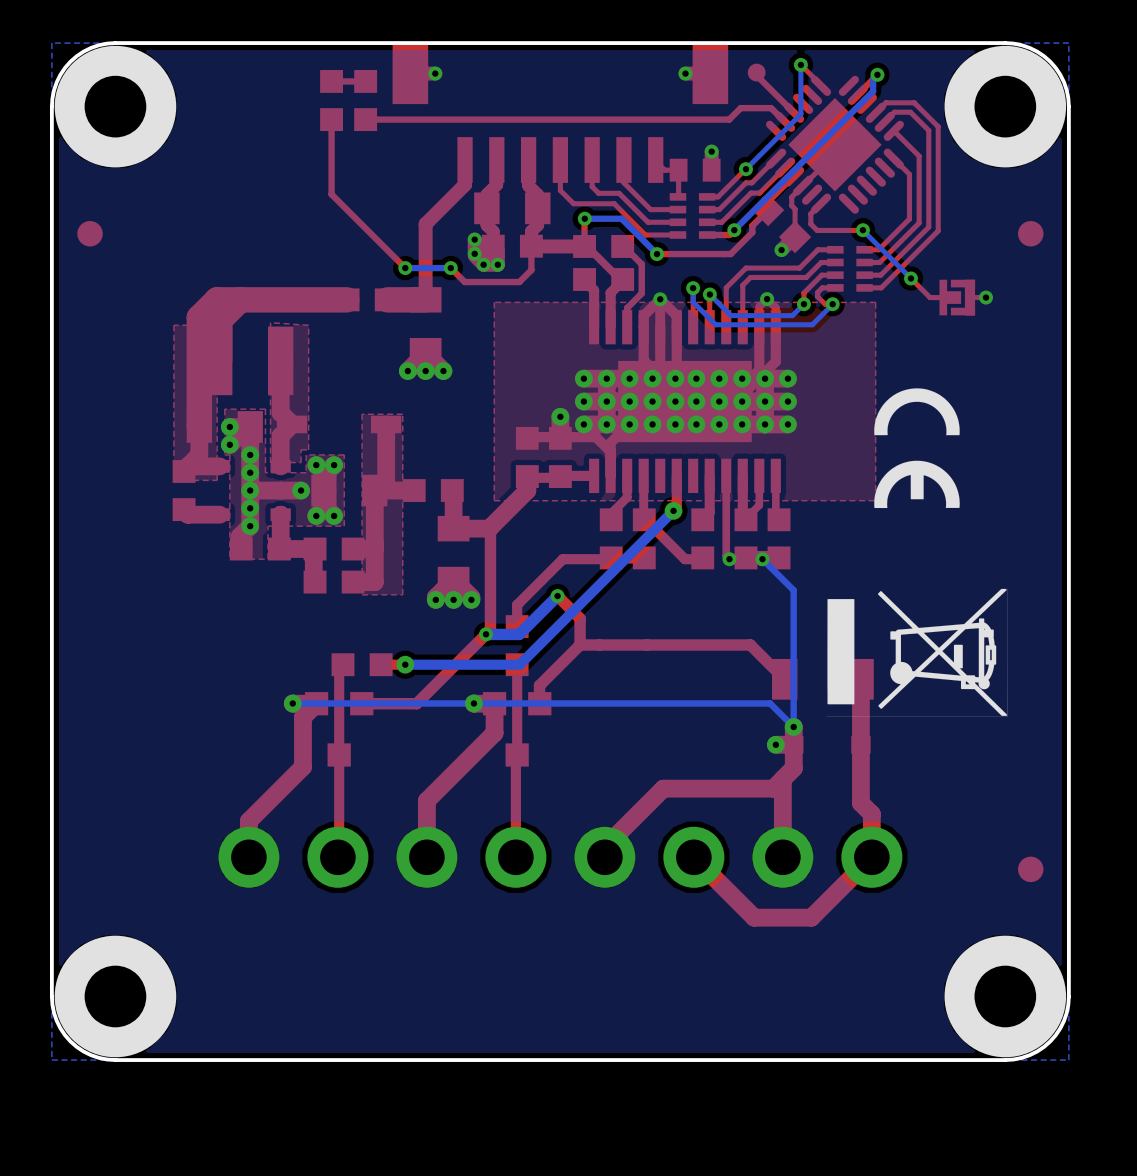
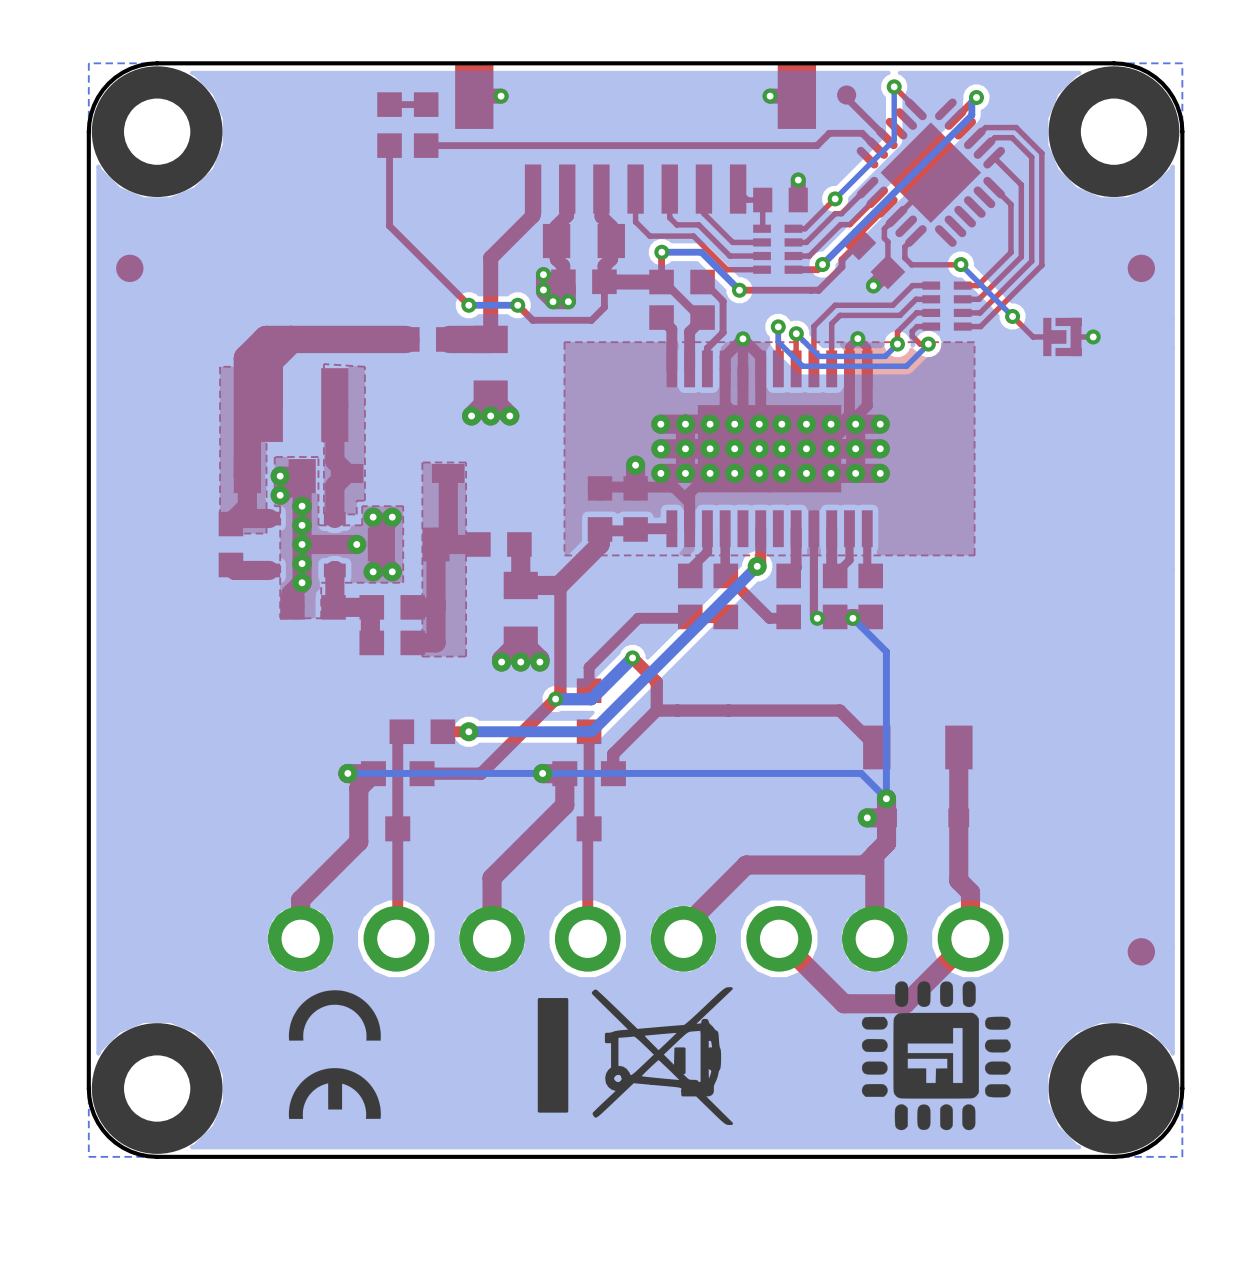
drawing: [874, 388, 960, 509] -> none
drawing: [826, 588, 1008, 717] -> none
drawing: none -> [861, 981, 1011, 1131]
drawing: none -> [537, 987, 734, 1125]
drawing: none -> [288, 990, 381, 1119]

